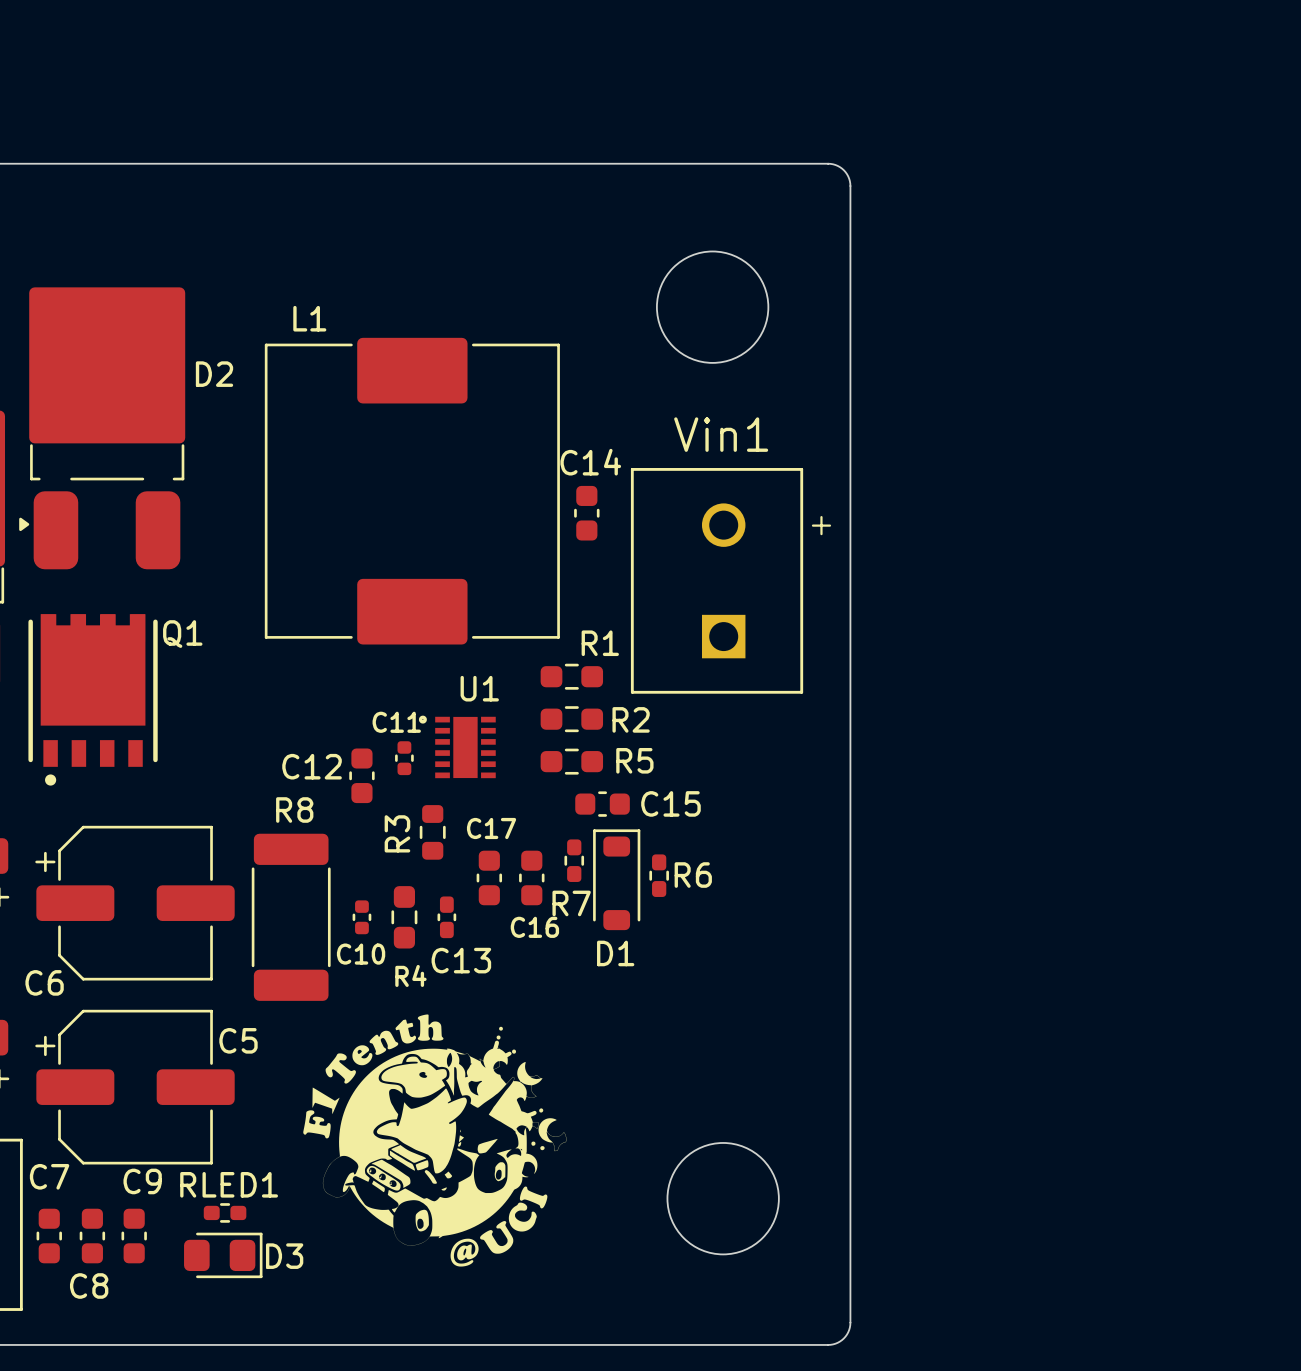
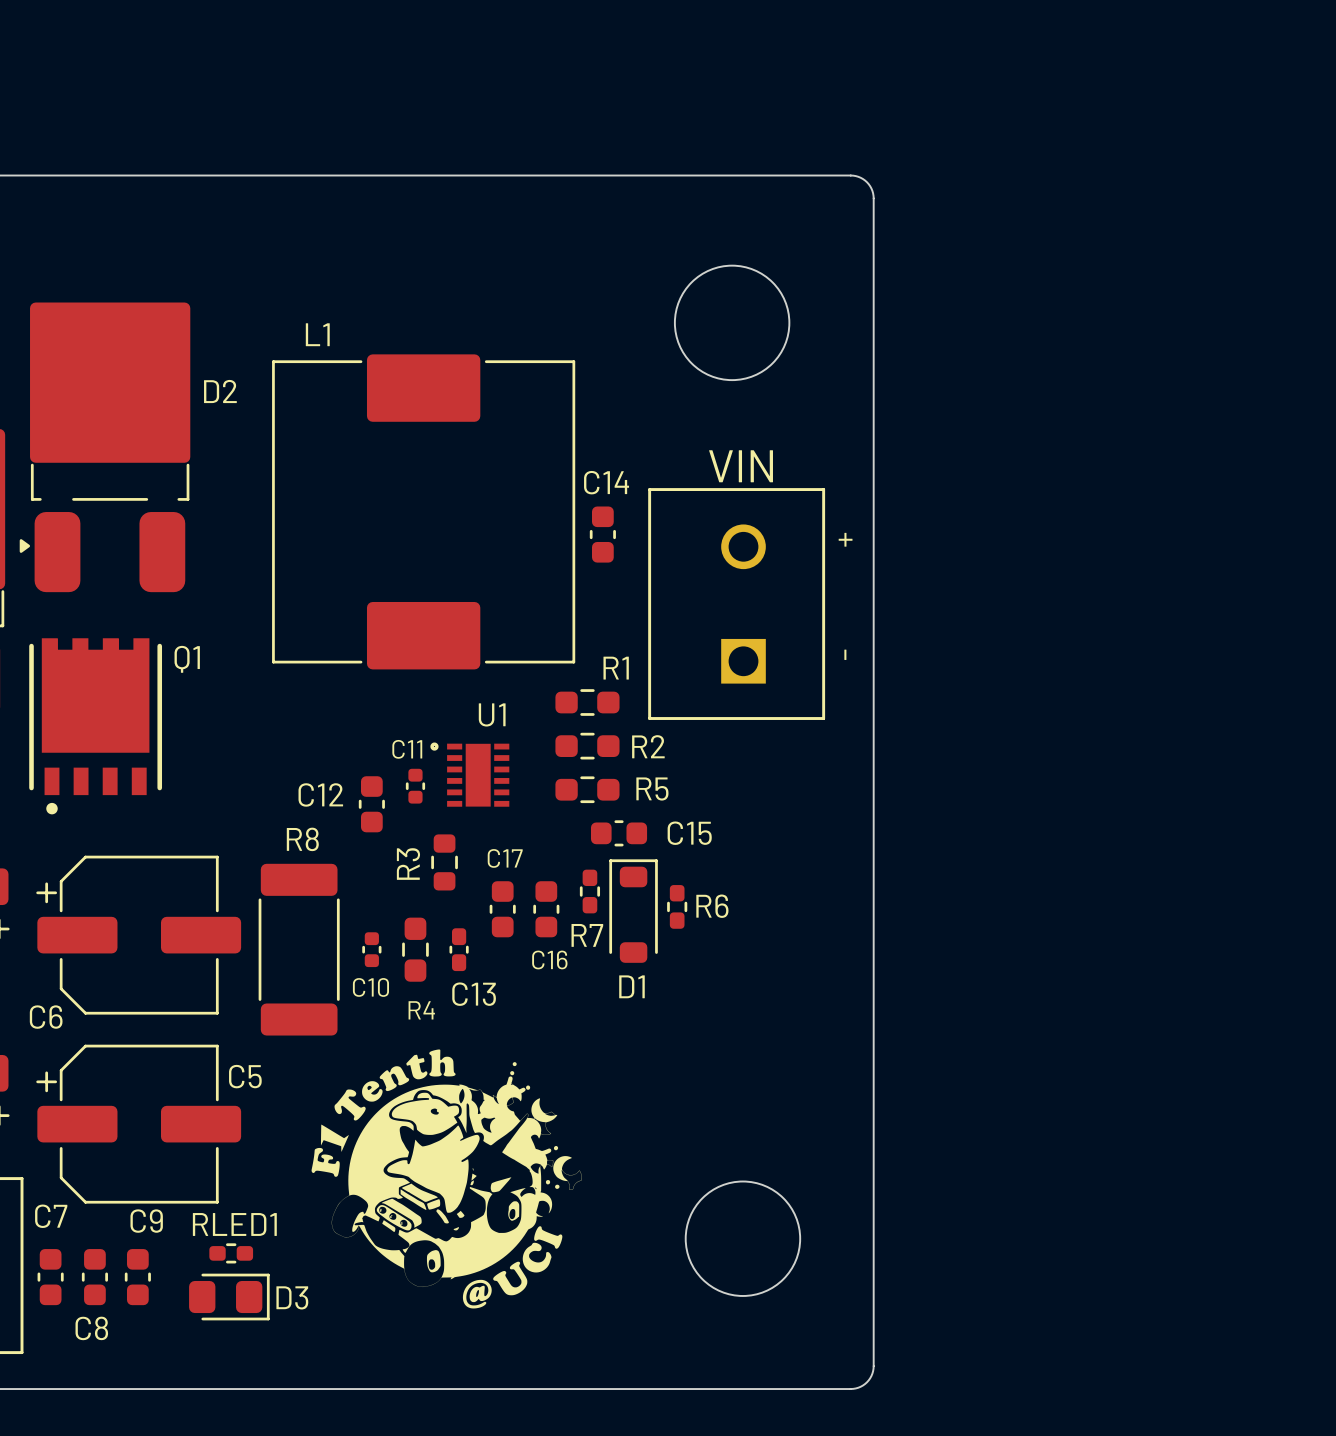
Vin1 name: Vin1 (721, 434) -> VIN (741, 466)
text: none -> - (845, 654)

